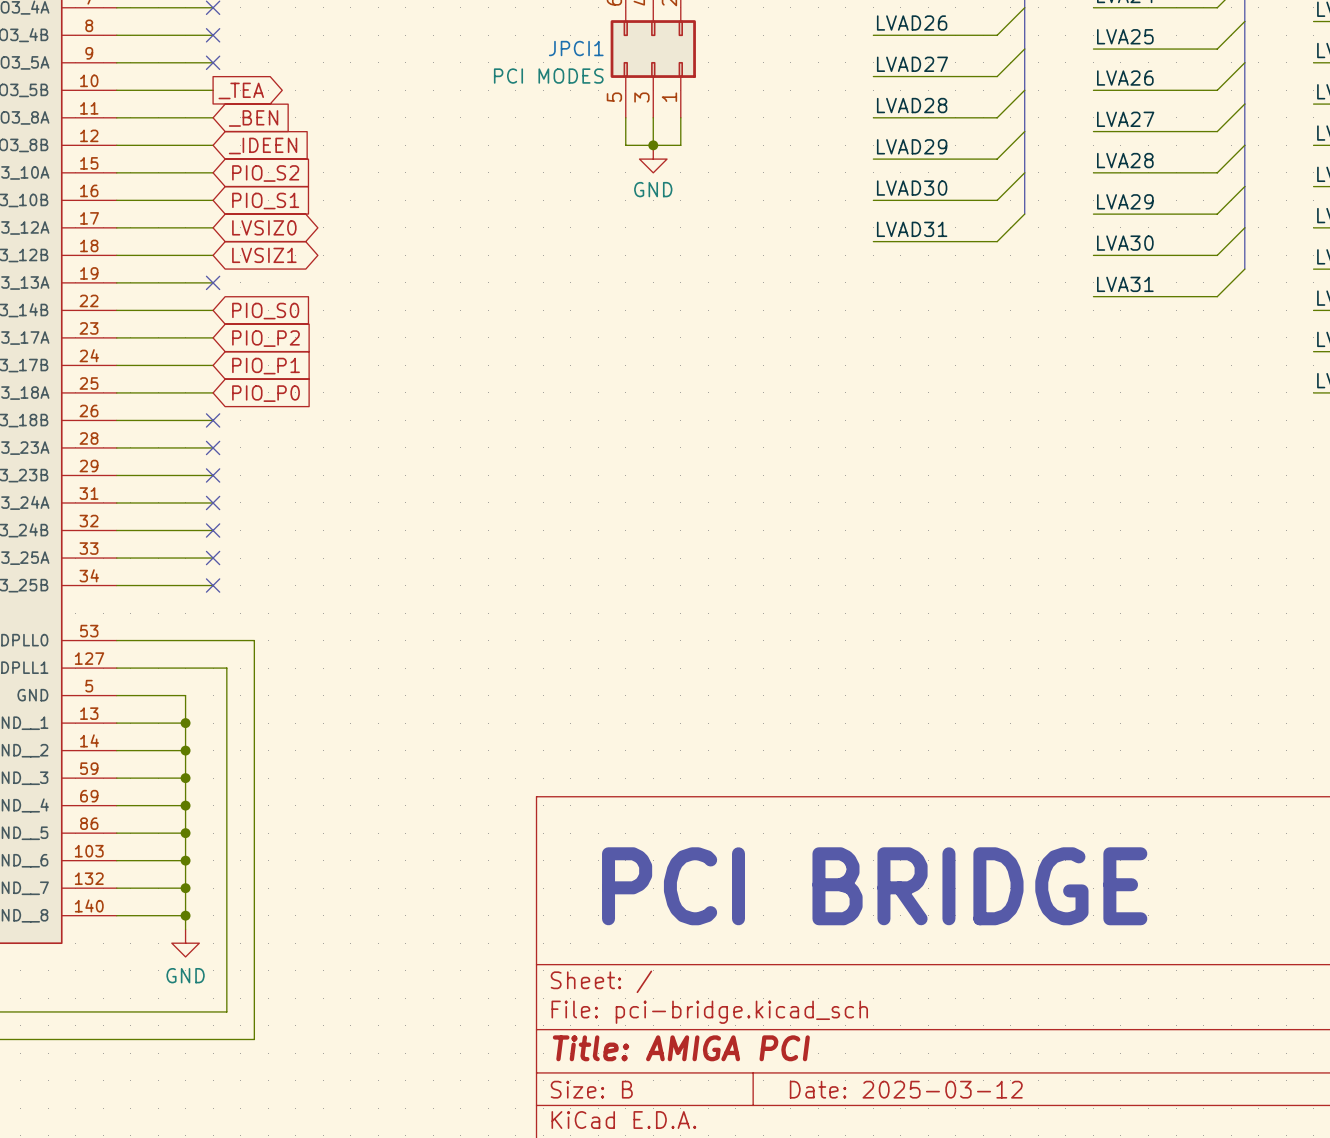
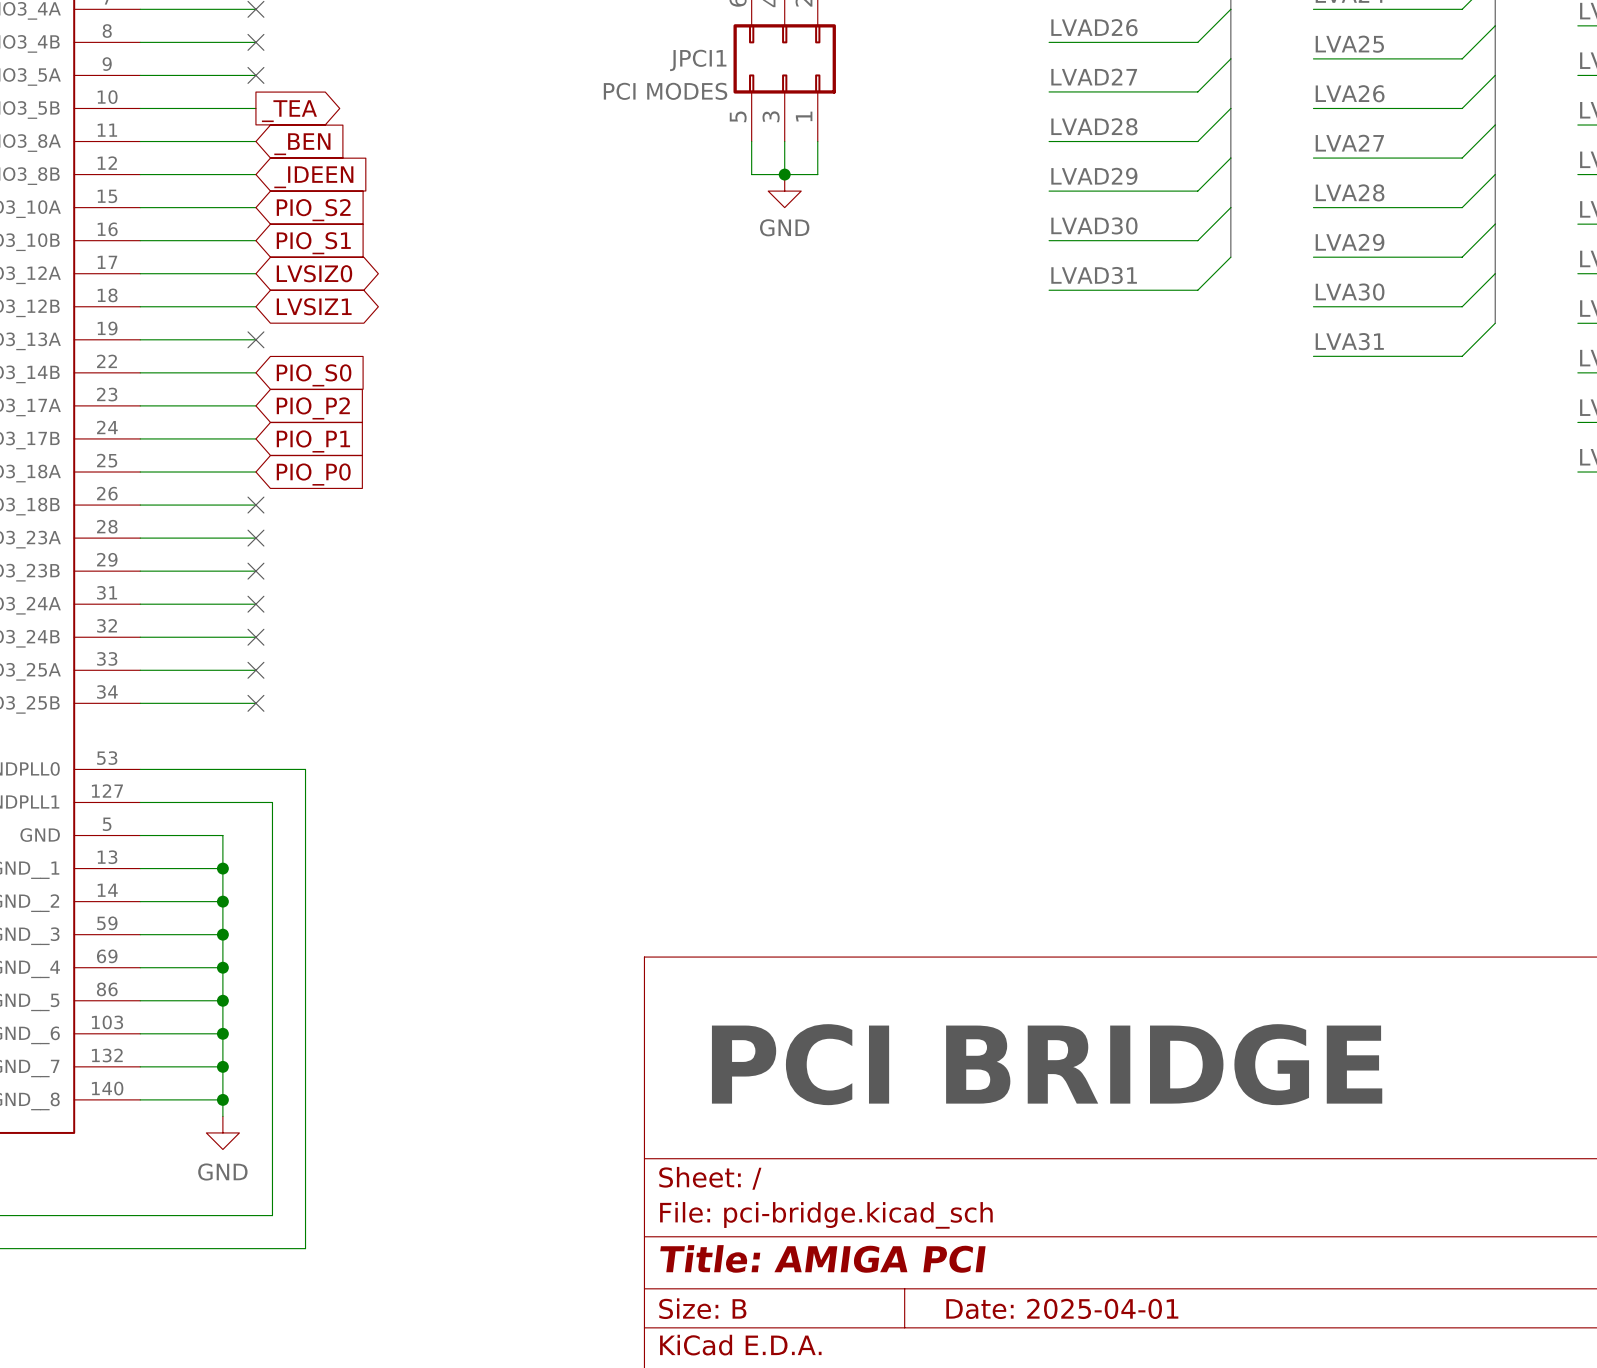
title block: Date: 2025-03-12 (906, 1089) -> Date: 2025-04-01 (1062, 1308)

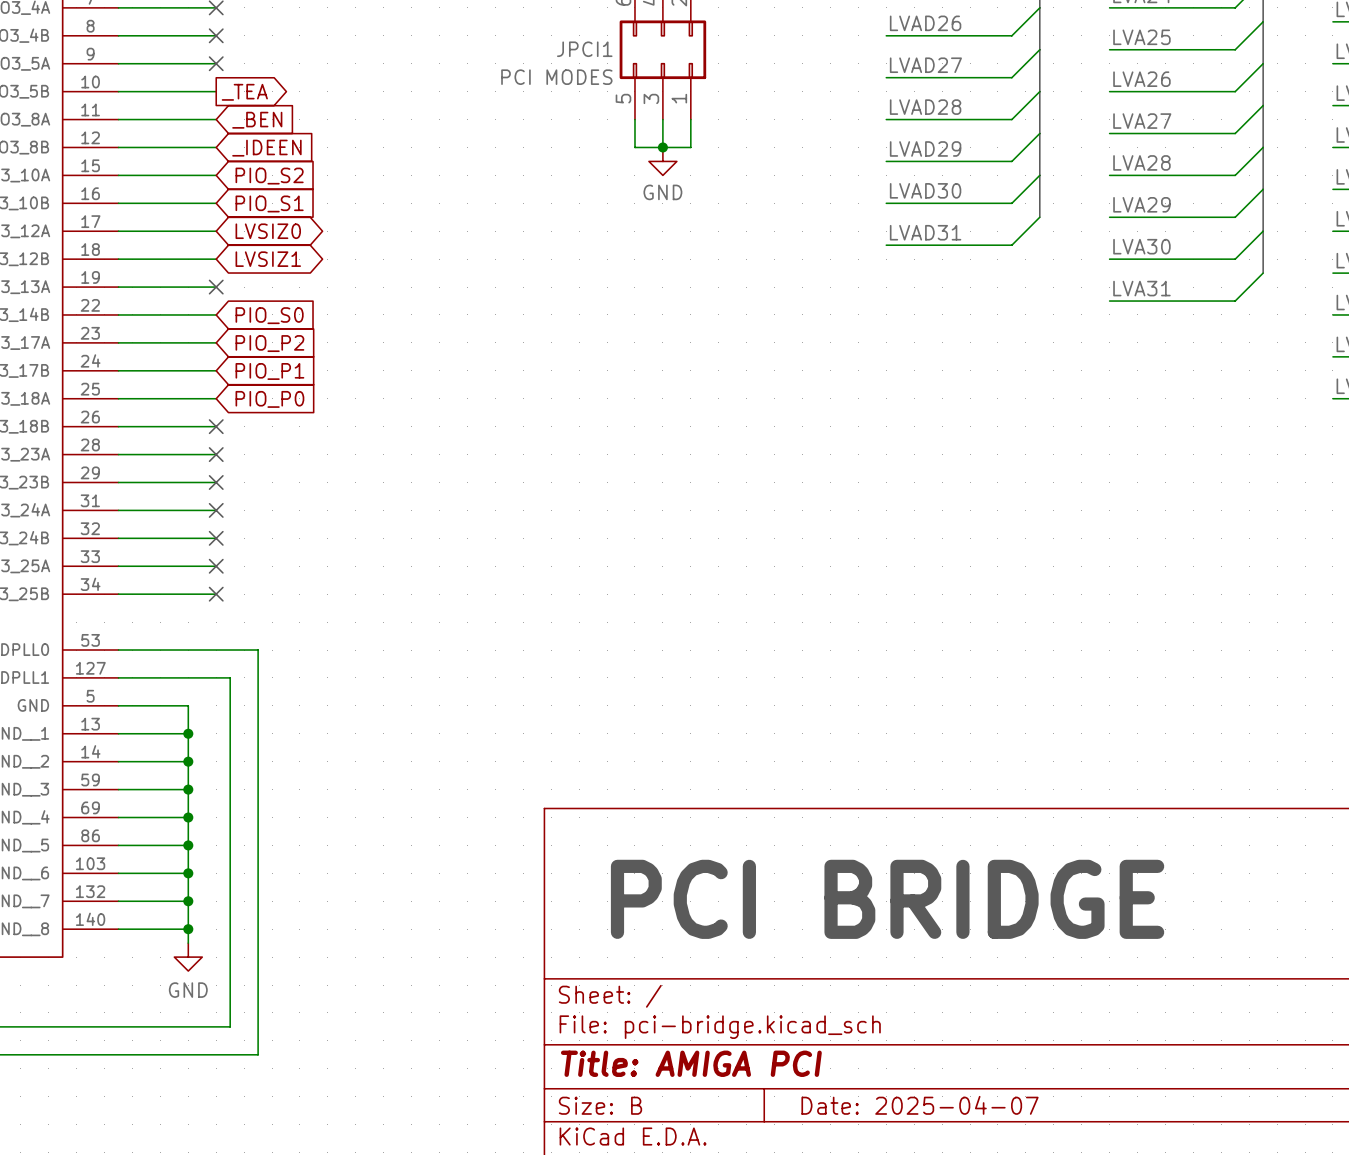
title block: Date: 2025-04-01 (1062, 1308) -> Date: 2025-04-07 (920, 1105)

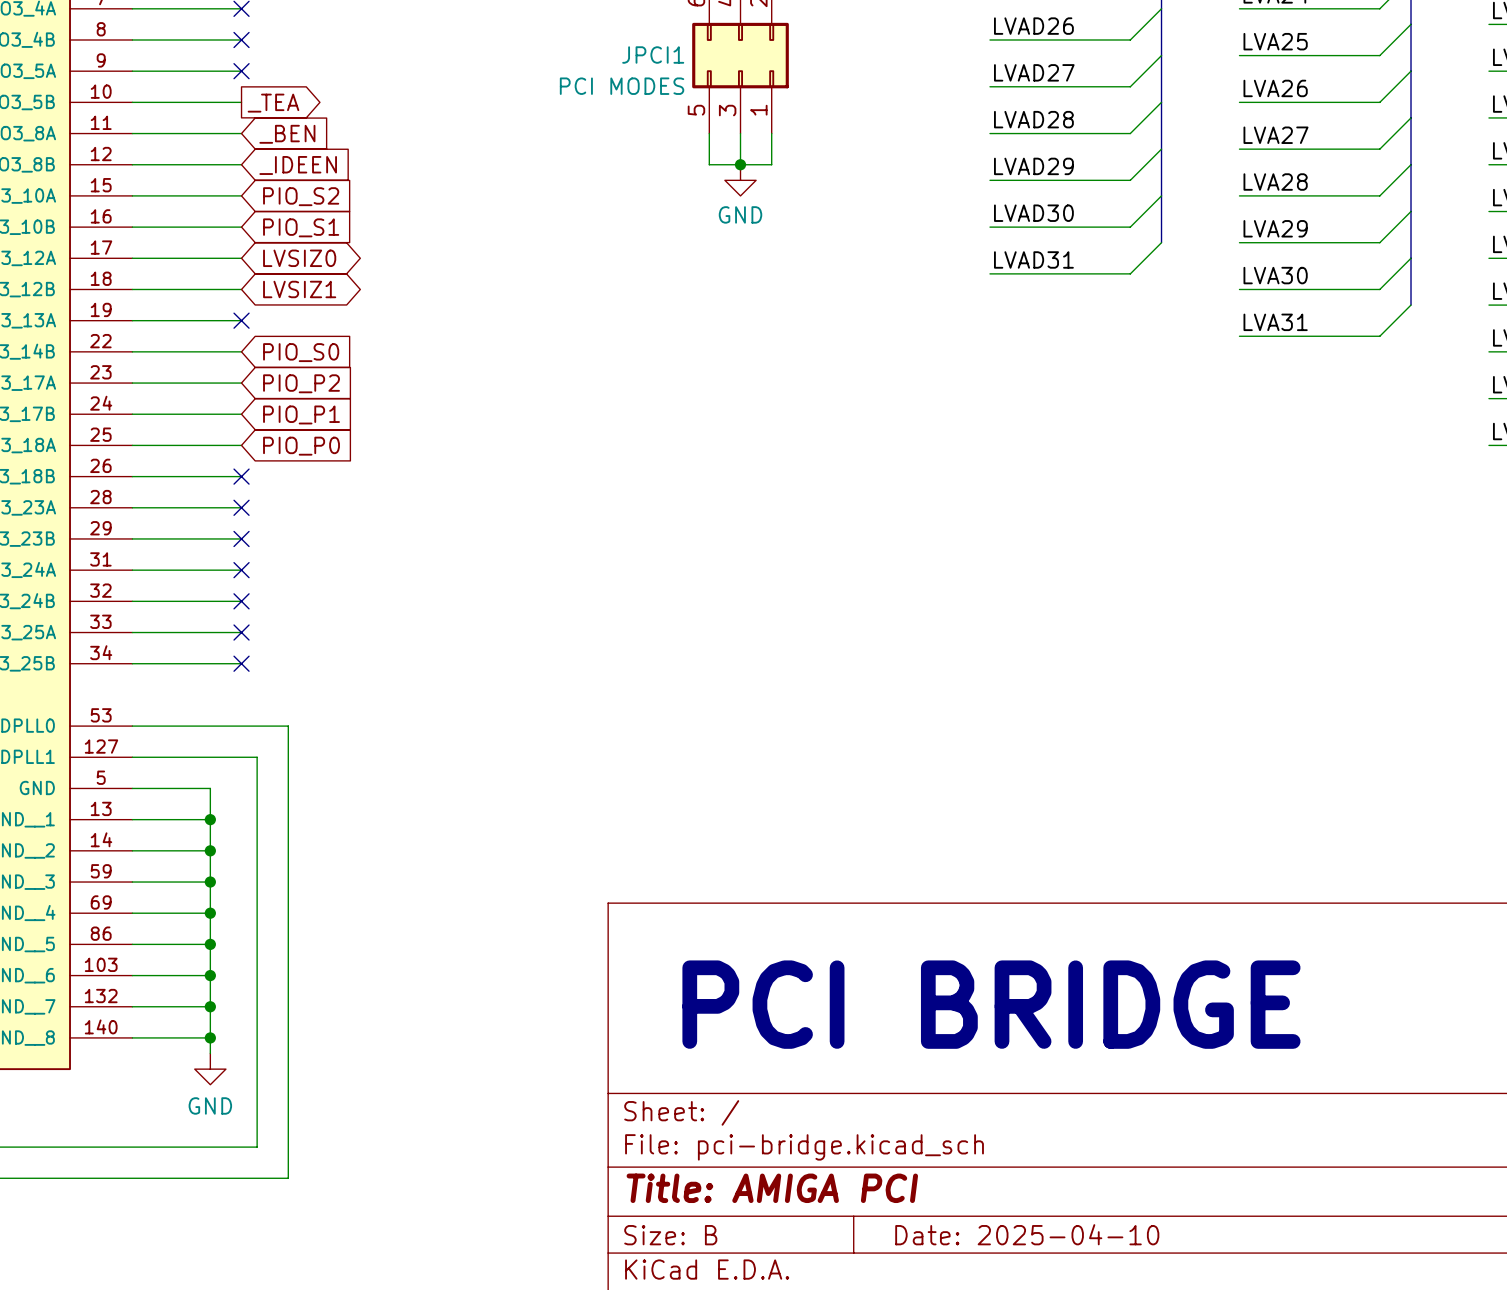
title block: Date: 2025-04-07 (920, 1105) -> Date: 2025-04-10 (1027, 1234)

